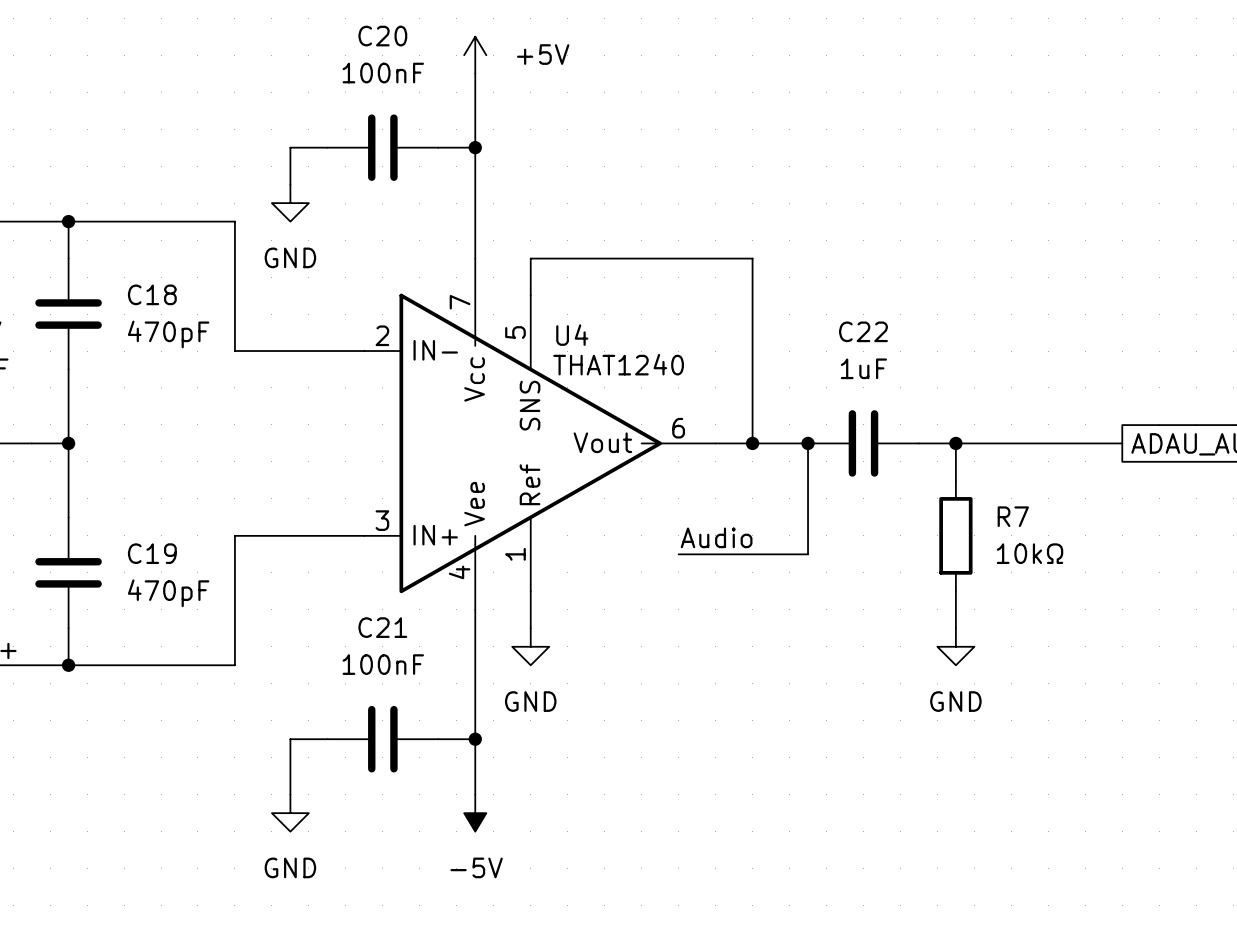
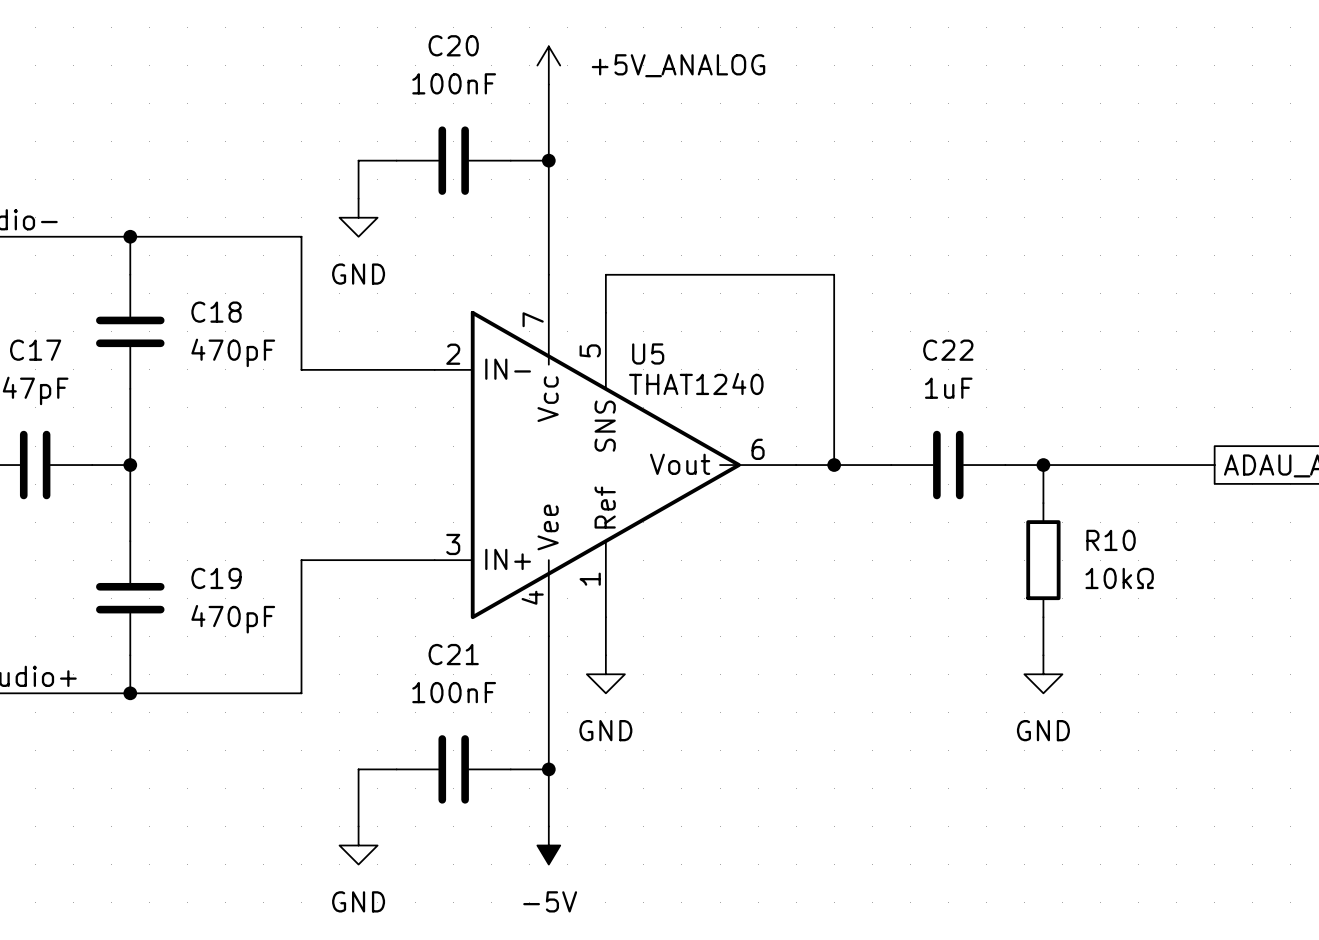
power symbol: +5V (475, 55) -> +5V_ANALOG (548, 65)
U4 name: U4 (572, 335) -> U5 (648, 353)
wire: (808, 443) (808, 554) (678, 554) -> none
junction: (808, 443) -> none
R7 name: R7 (1013, 516) -> R10 (1111, 540)
label: Audio (716, 537) -> none

